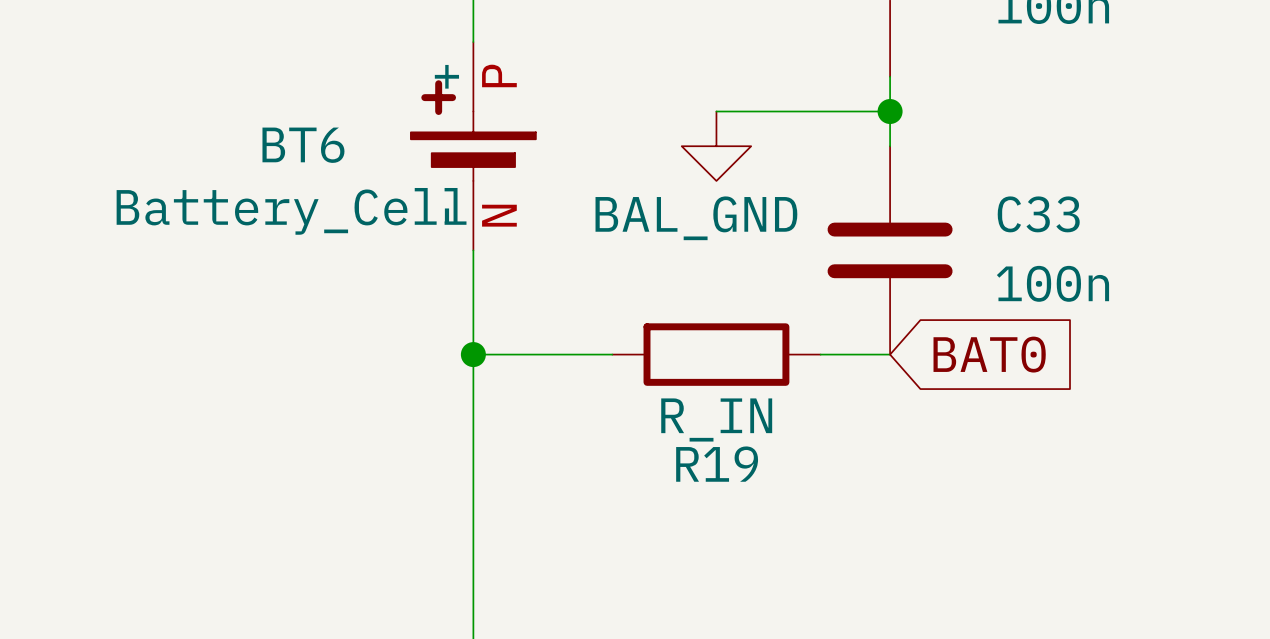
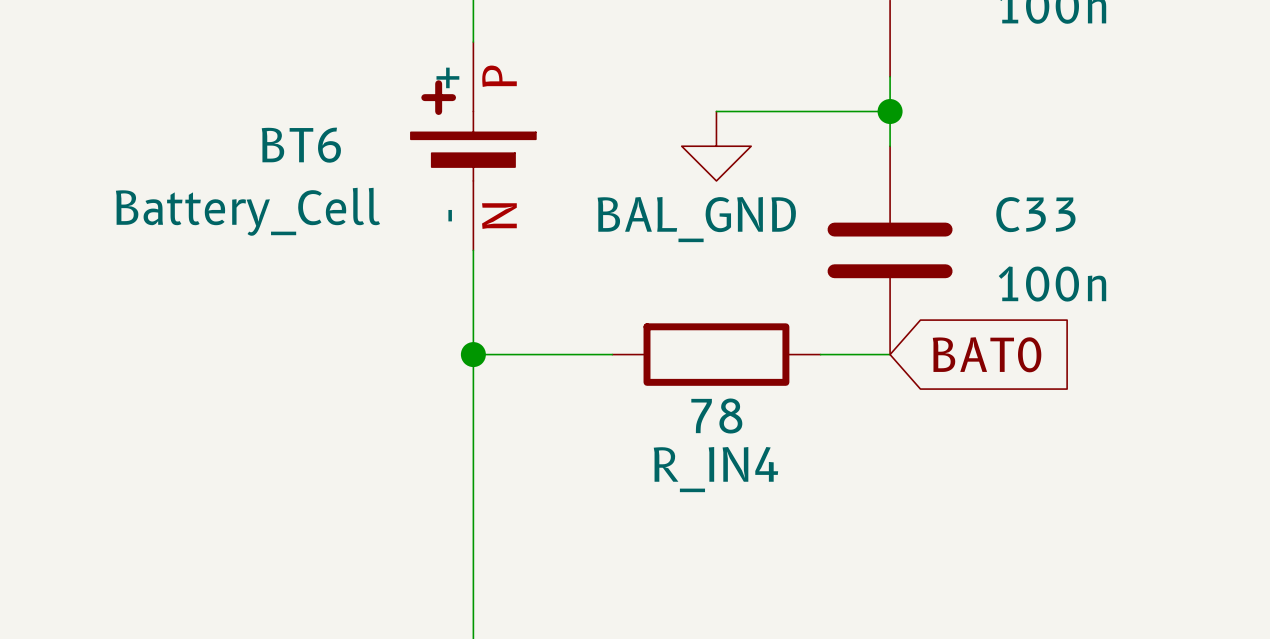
R19 value: R_IN (716, 419) -> 78 (716, 416)
R19 name: R19 (717, 464) -> R_IN4 (715, 469)

